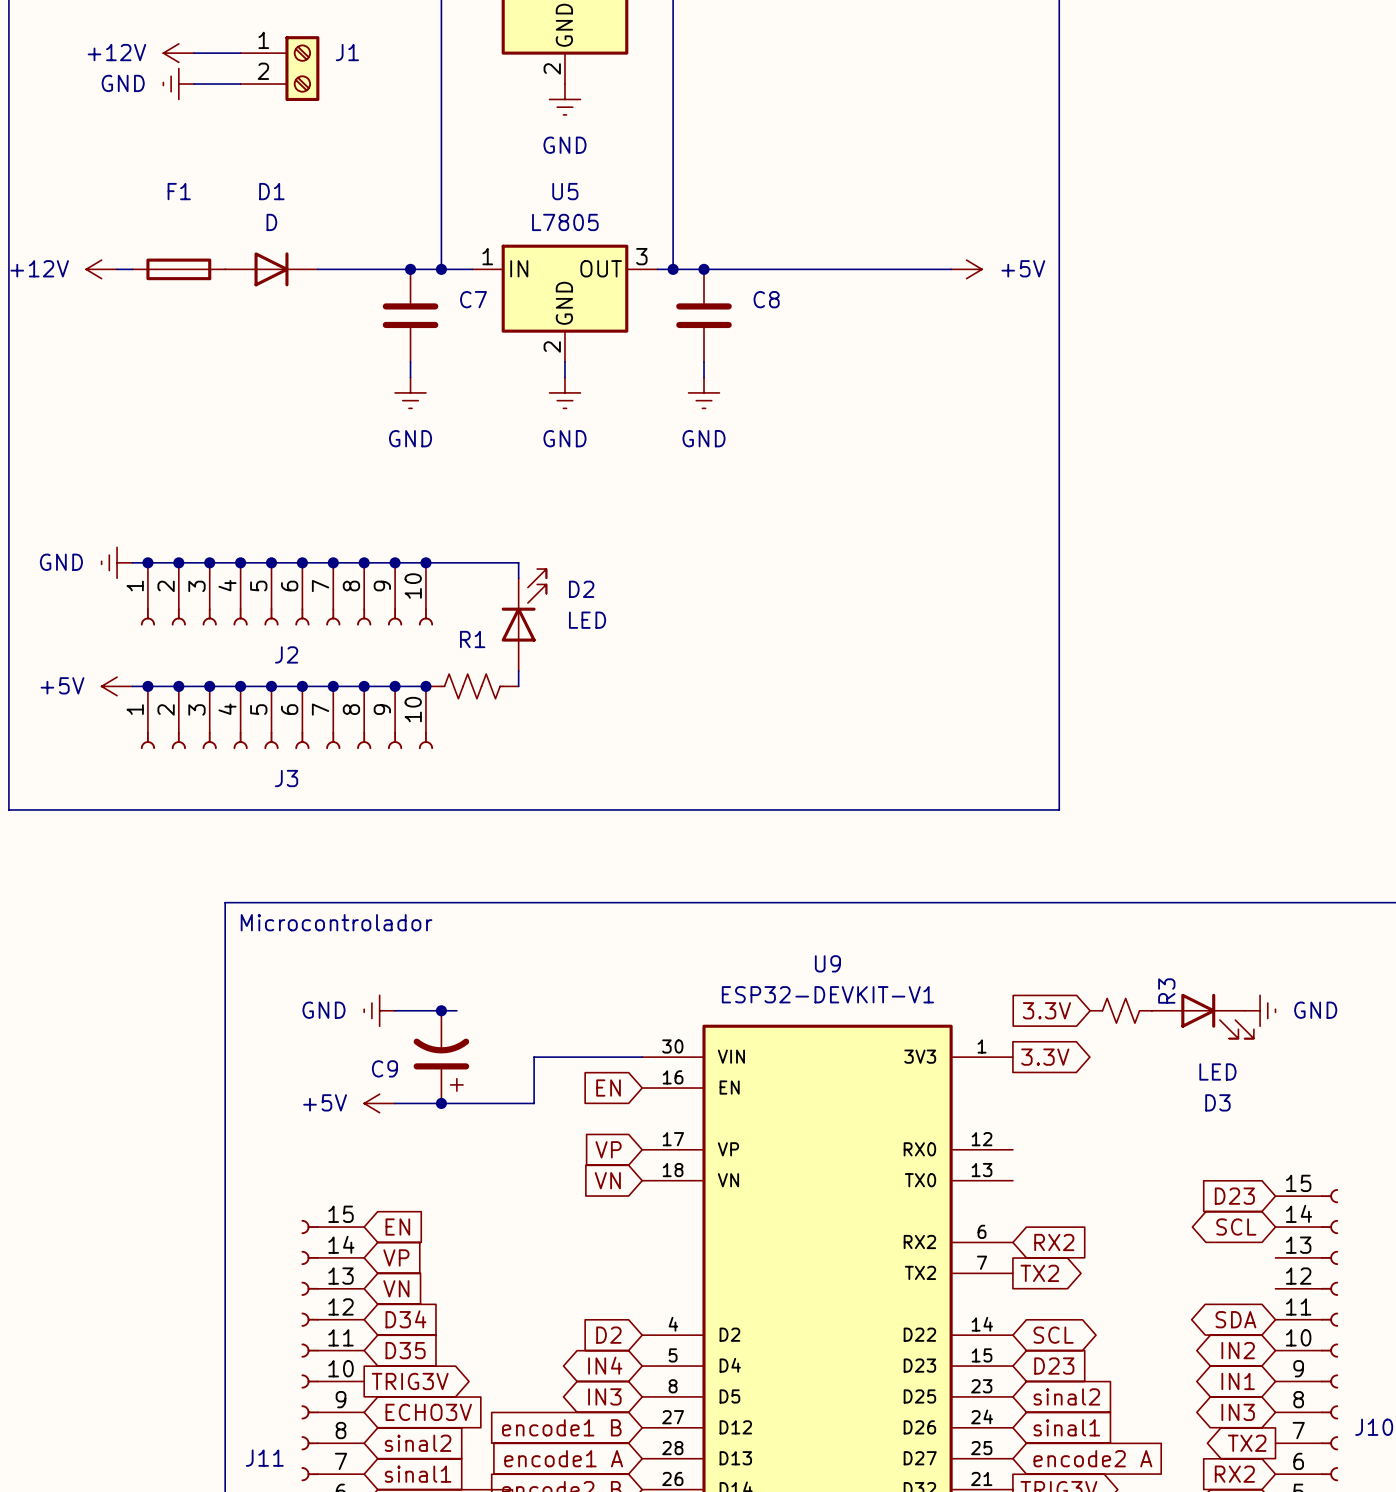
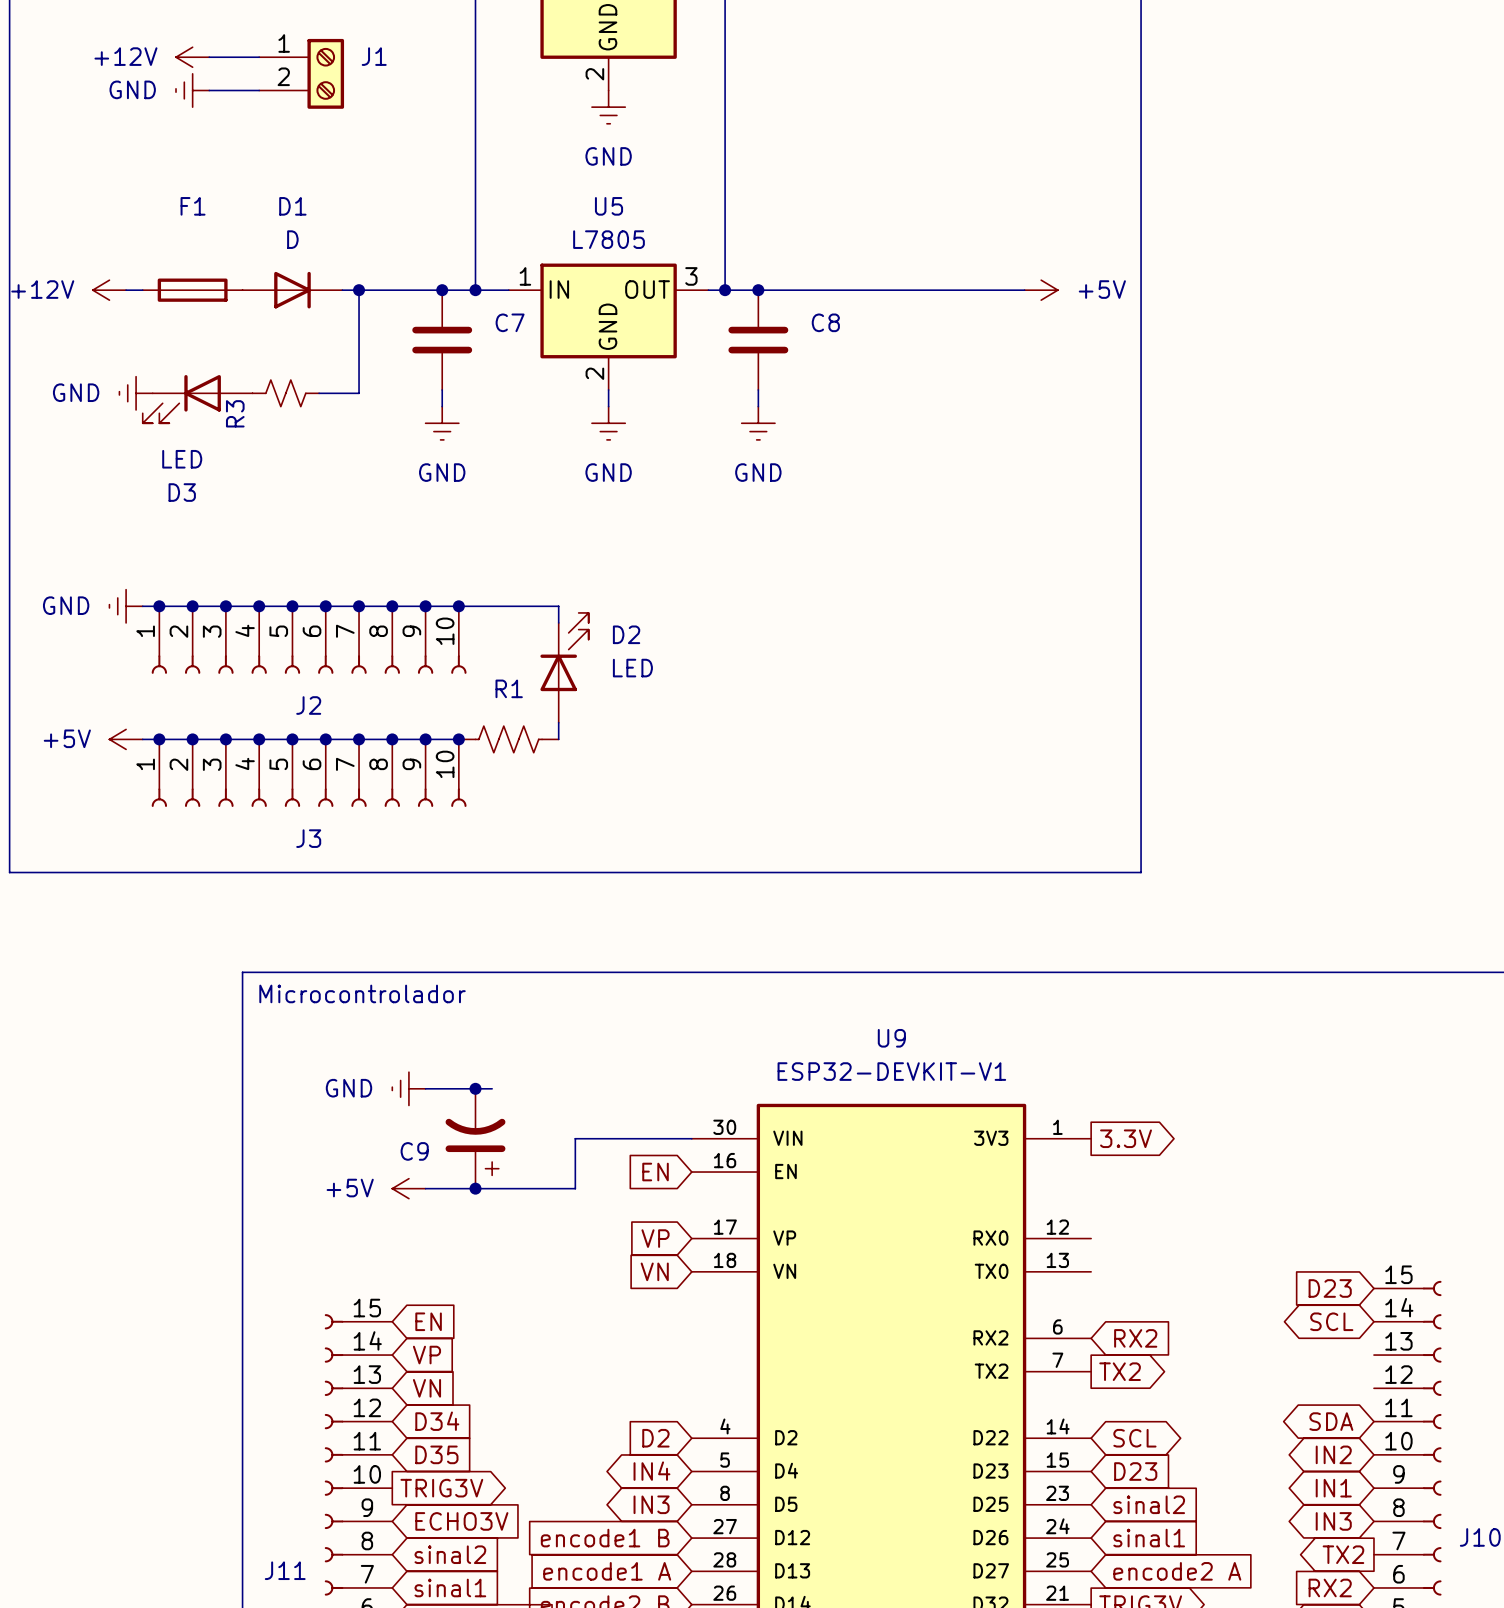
wire: none -> (359, 290) (359, 393) (319, 393)
junction: none -> (359, 290)
power symbol: none -> GND (136, 393)
R3 name position: R3 (1166, 991) -> R3 (235, 413)
global label: 3.3V (1046, 1010) -> none
R3 position: (1121, 1010) -> (285, 393)
power symbol: GND (1260, 1010) -> none
D3 position: (1202, 1016) -> (197, 399)
D3 flip: as is (1217, 1016) -> left-right (181, 399)

